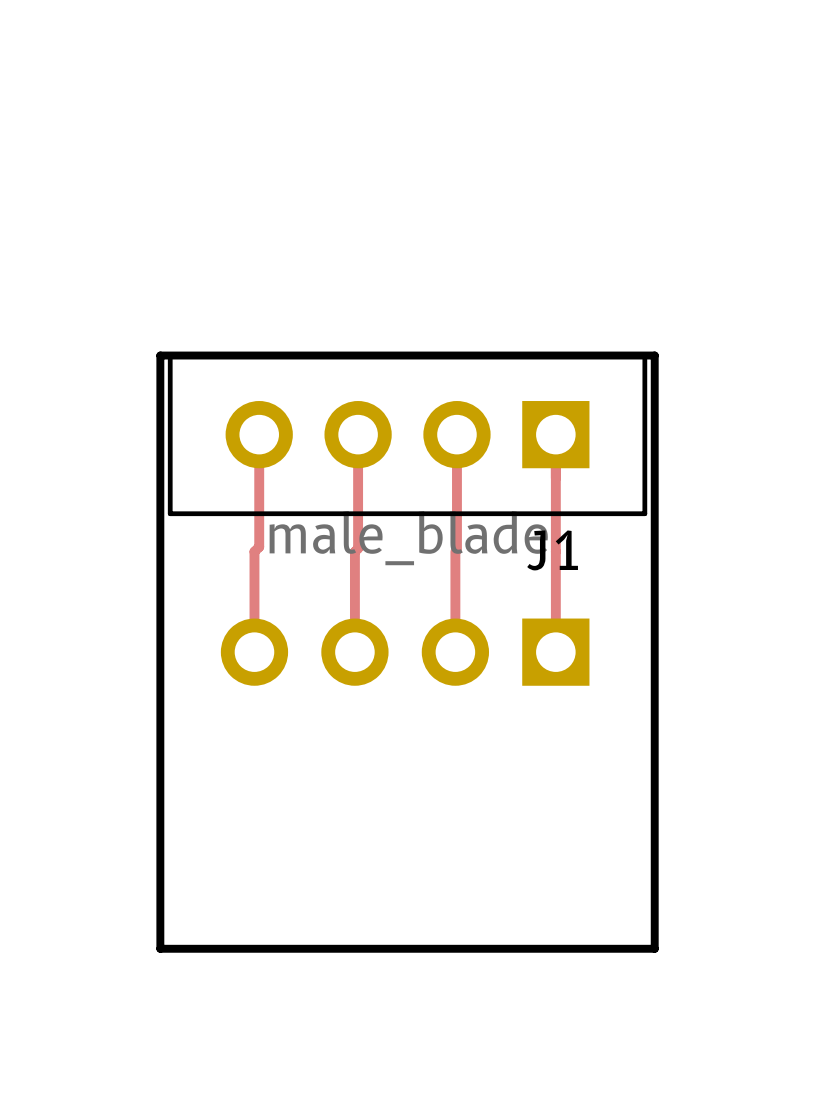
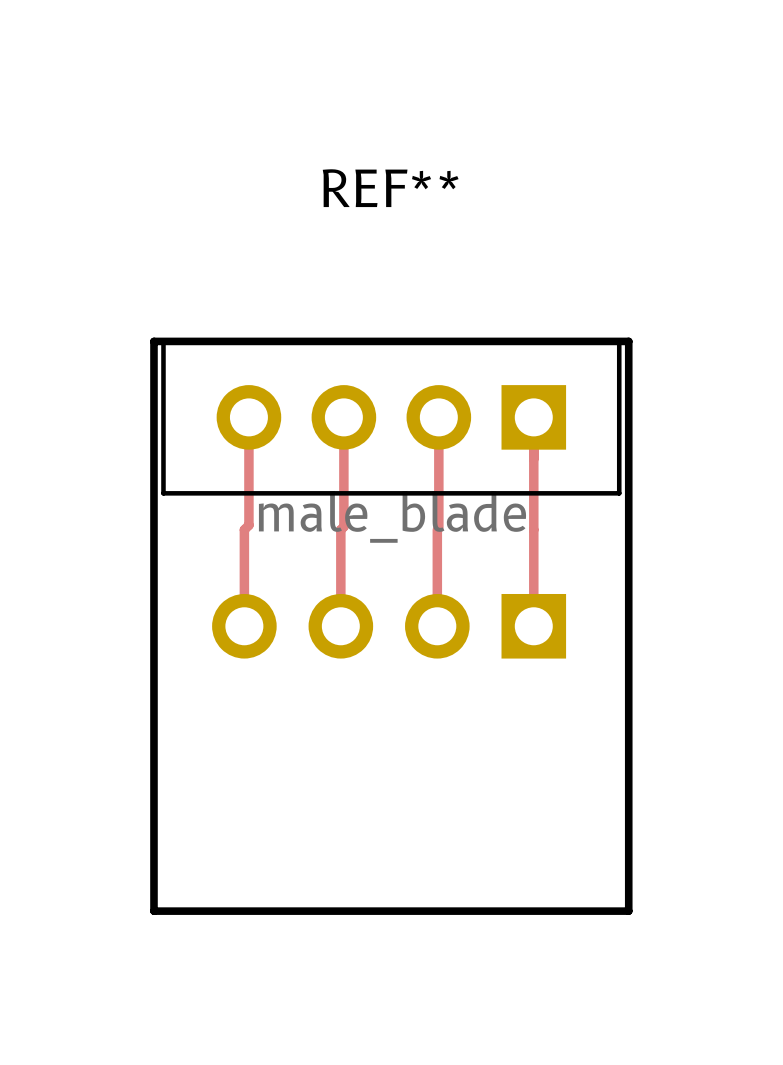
J1 name: J1 (552, 550) -> REF** (390, 188)

